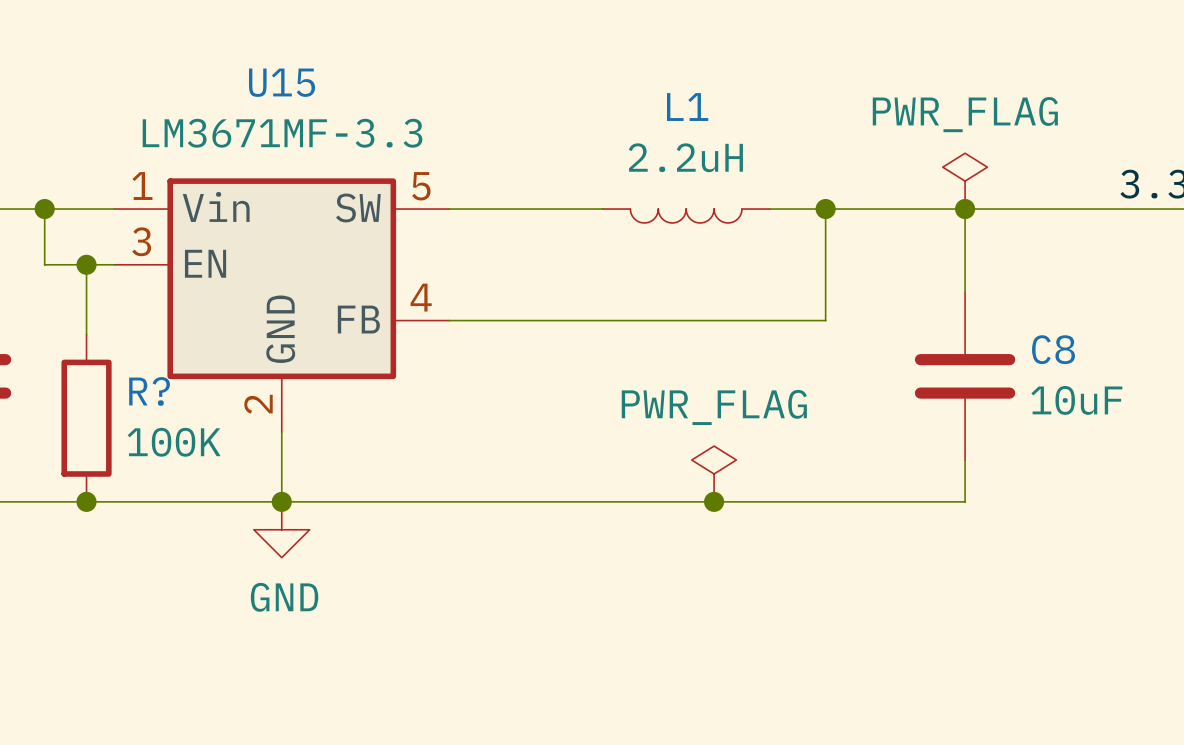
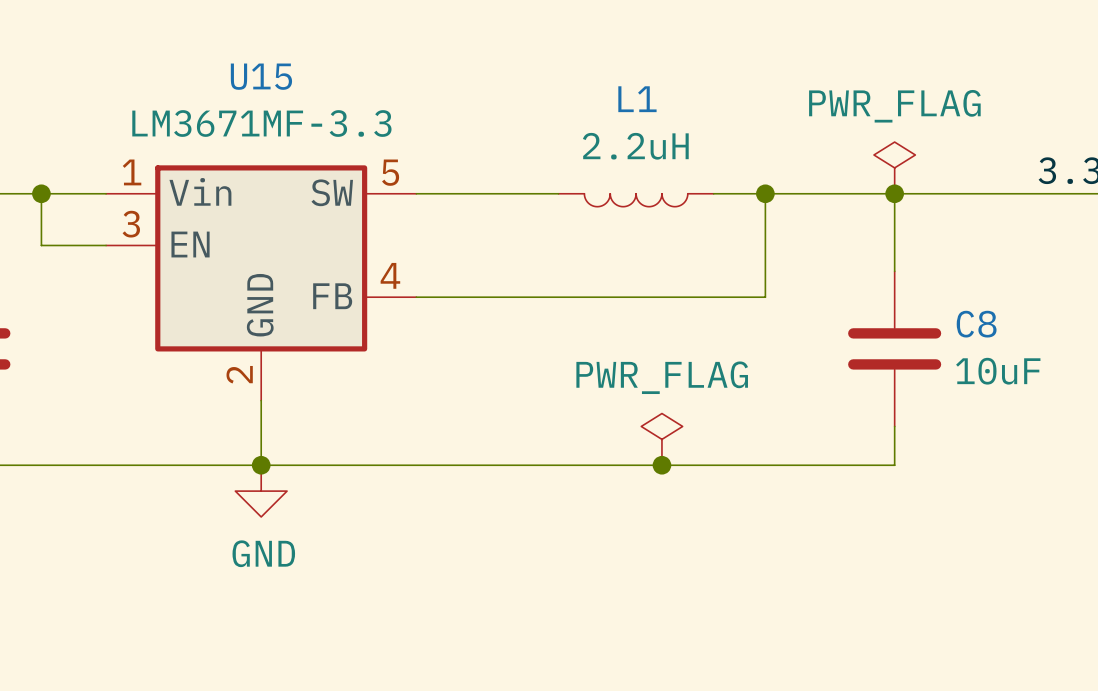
wire: (86, 264) (86, 334) -> none
junction: (86, 264) -> none
R?: 100K (86, 418) -> none
junction: (86, 501) -> none

